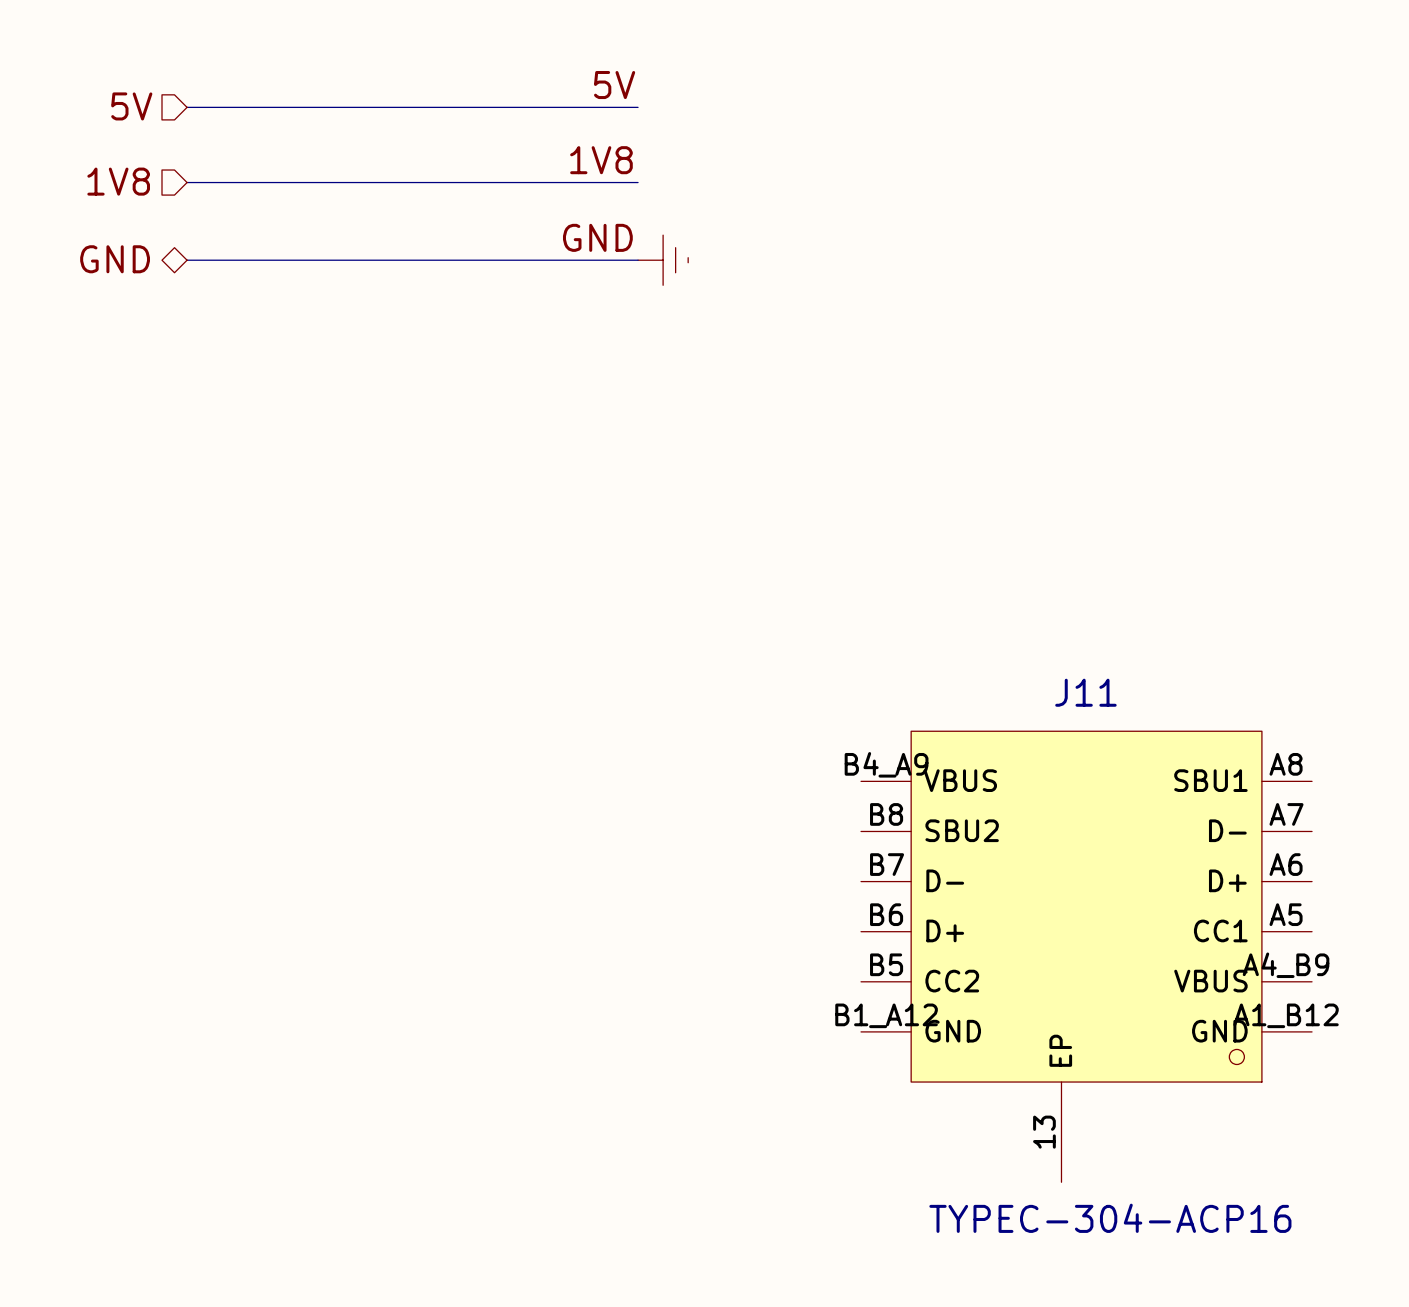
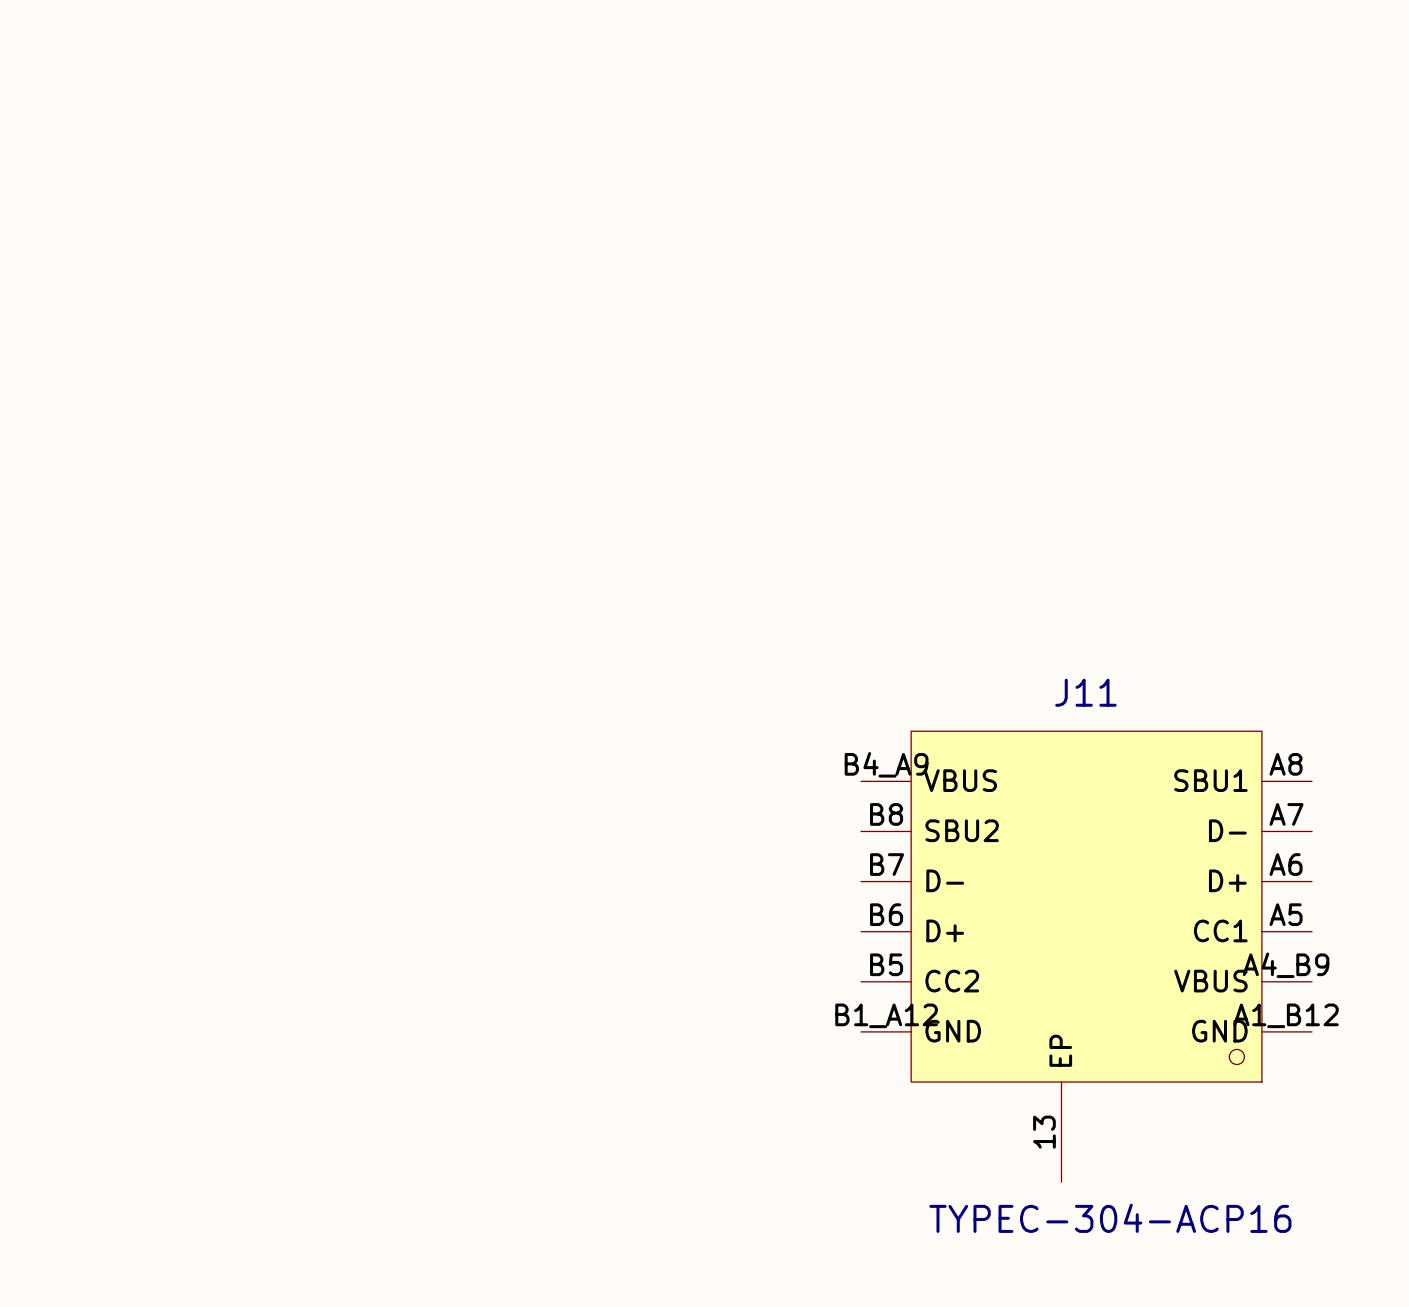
label: 5V (614, 85) -> none
hierarchical label: 5V (131, 106) -> none
wire: (187, 107) (638, 107) -> none
label: 1V8 (601, 160) -> none
hierarchical label: 1V8 (118, 181) -> none
wire: (187, 182) (638, 182) -> none
label: GND (597, 237) -> none
hierarchical label: GND (115, 259) -> none
wire: (187, 260) (638, 260) -> none
power symbol: (663, 260) -> none

